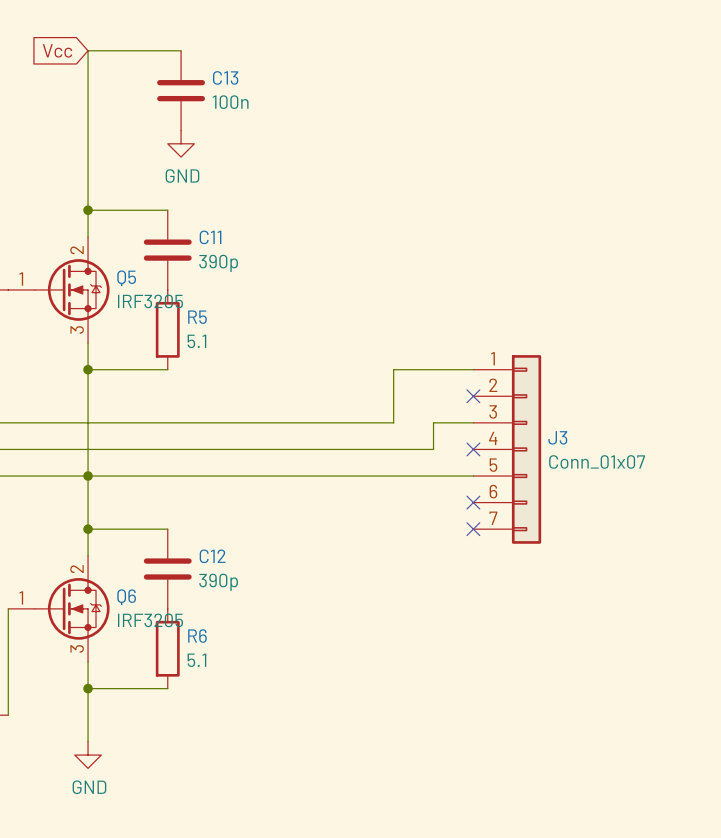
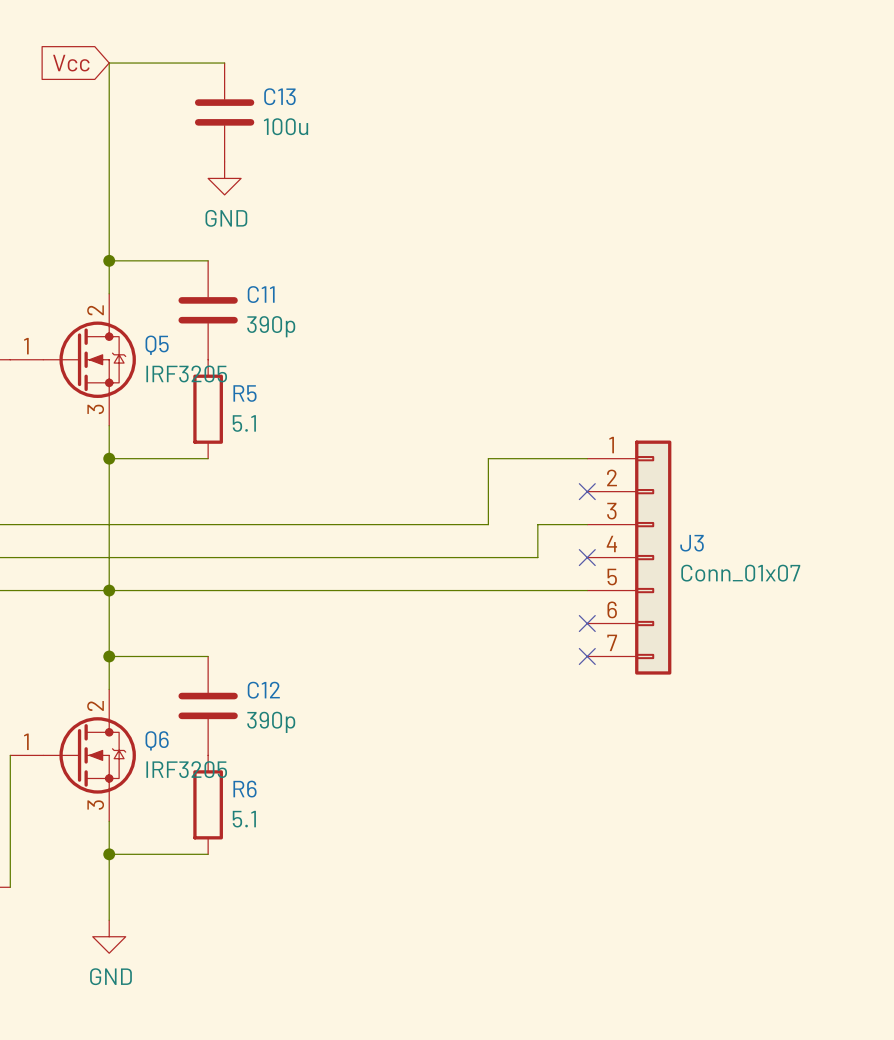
C13 value: 100n (230, 102) -> 100u (286, 126)

